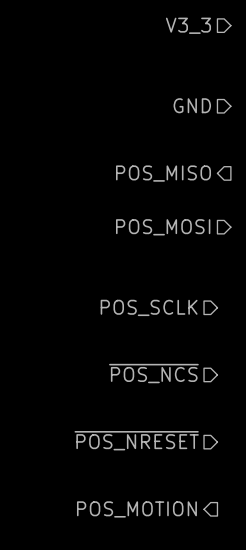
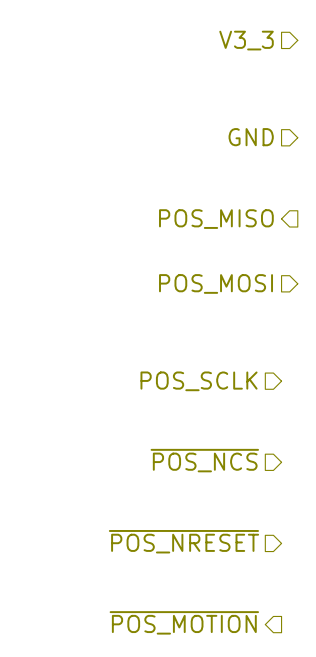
hierarchical label: POS_MOTION (136, 509) -> ~{POS_MOTION} (184, 622)

